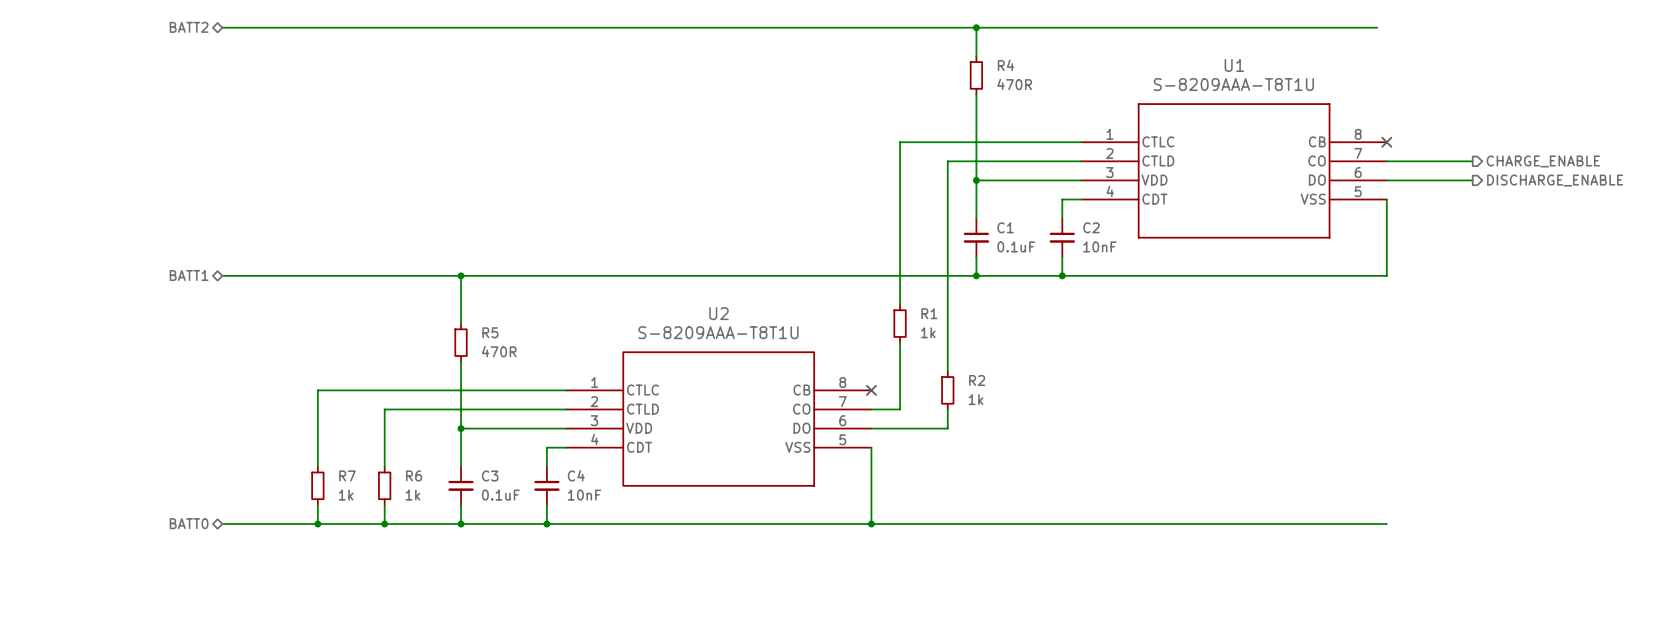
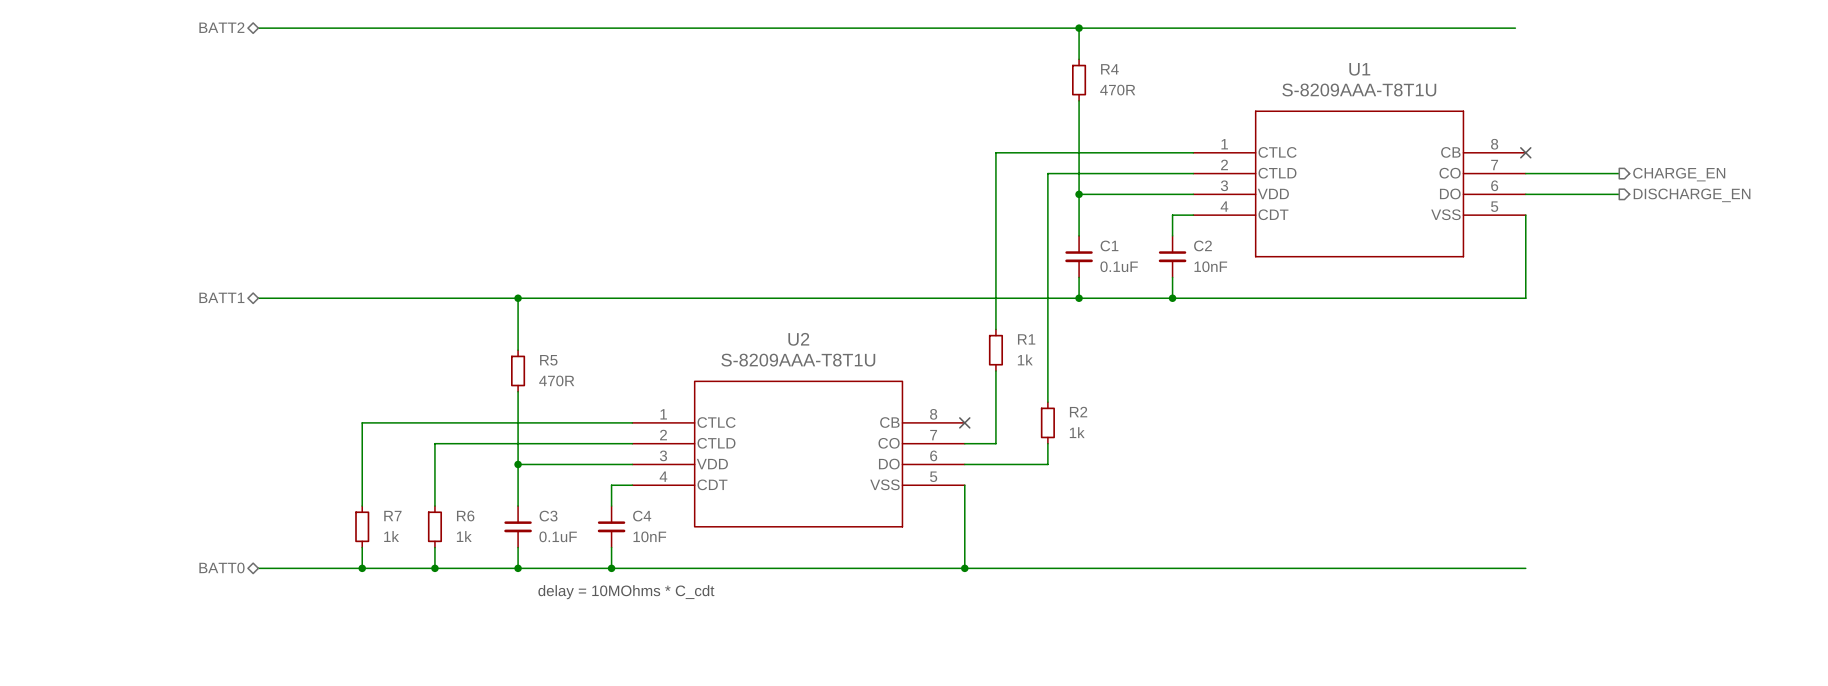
hierarchical label: CHARGE_ENABLE (1543, 161) -> CHARGE_EN (1679, 174)
hierarchical label: DISCHARGE_ENABLE (1555, 180) -> DISCHARGE_EN (1692, 195)
text: none -> delay = 10MOhms * C_cdt (626, 592)

